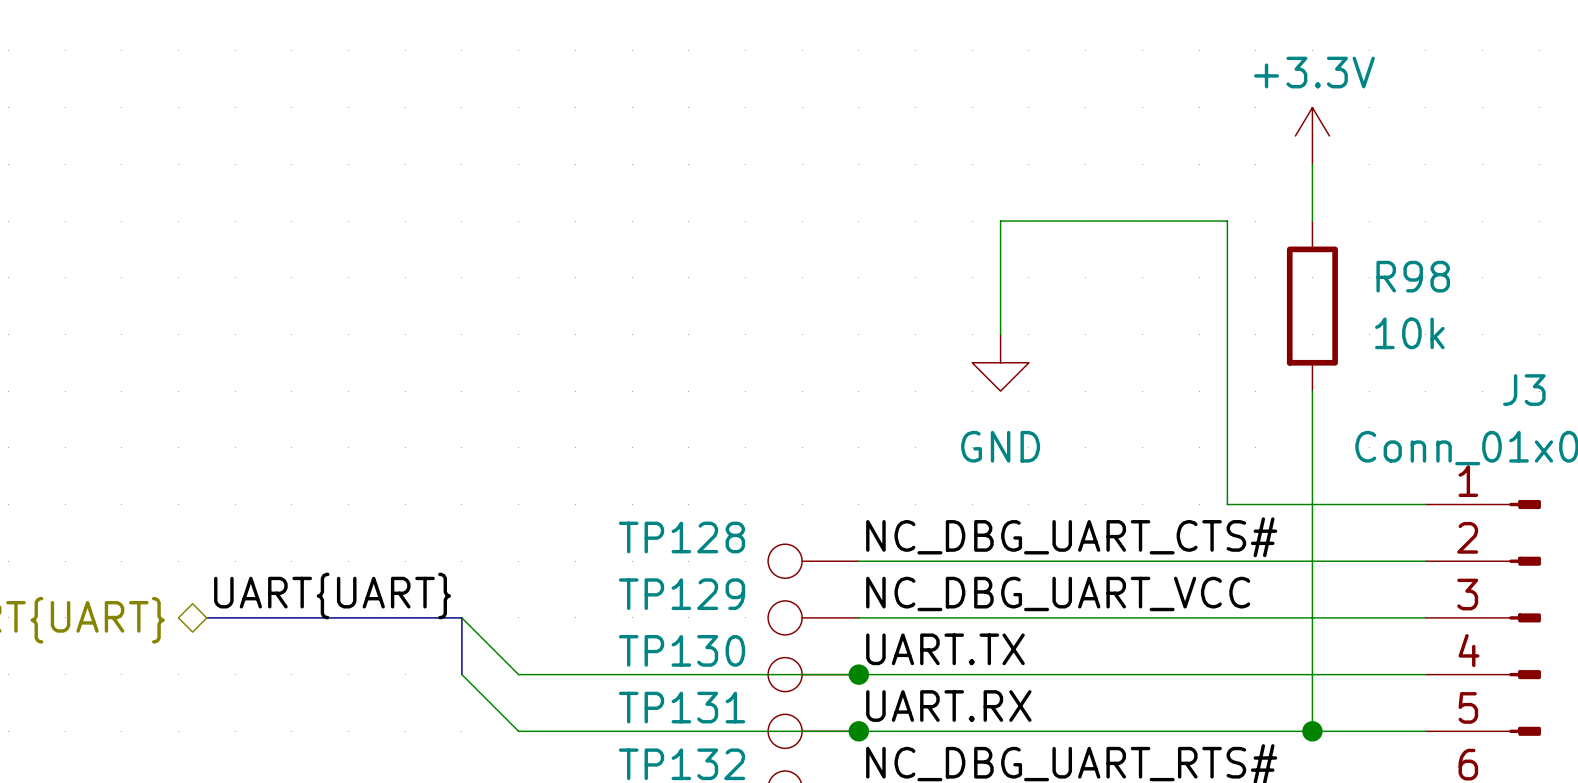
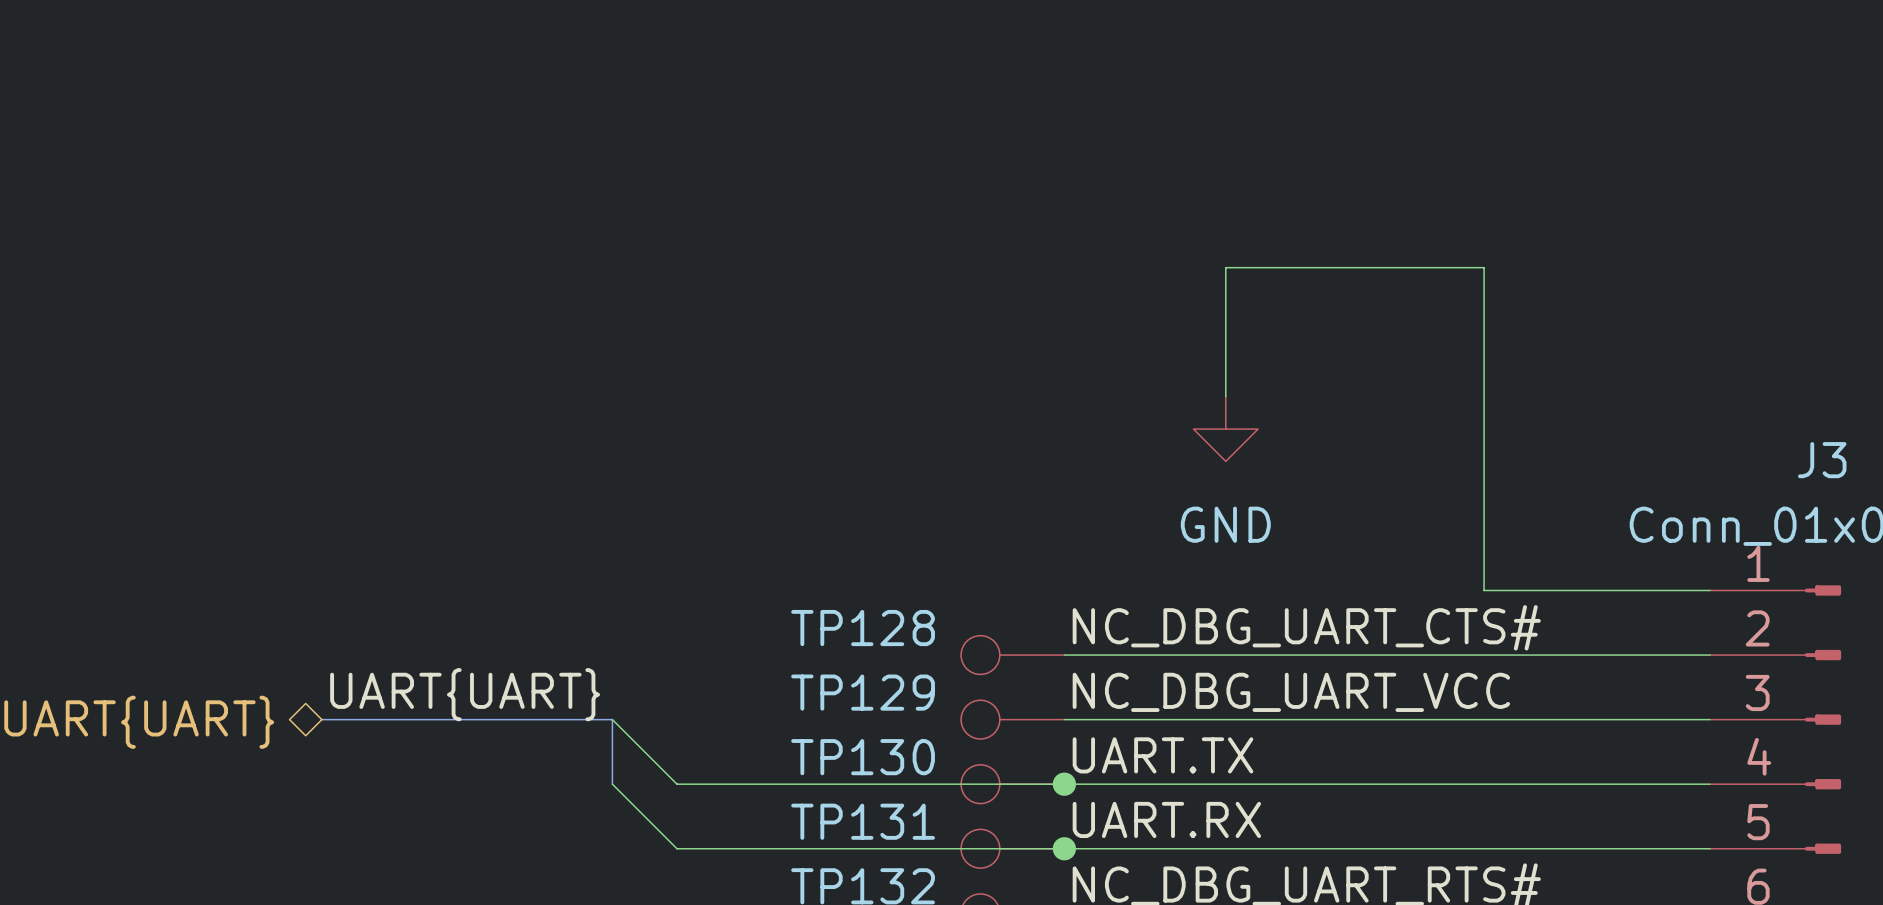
power symbol: +3.3V (1312, 135) -> none
wire: (1312, 164) (1312, 221) -> none
R98: 10k (1312, 306) -> none
wire: (1312, 391) (1312, 731) -> none
junction: (1312, 731) -> none

